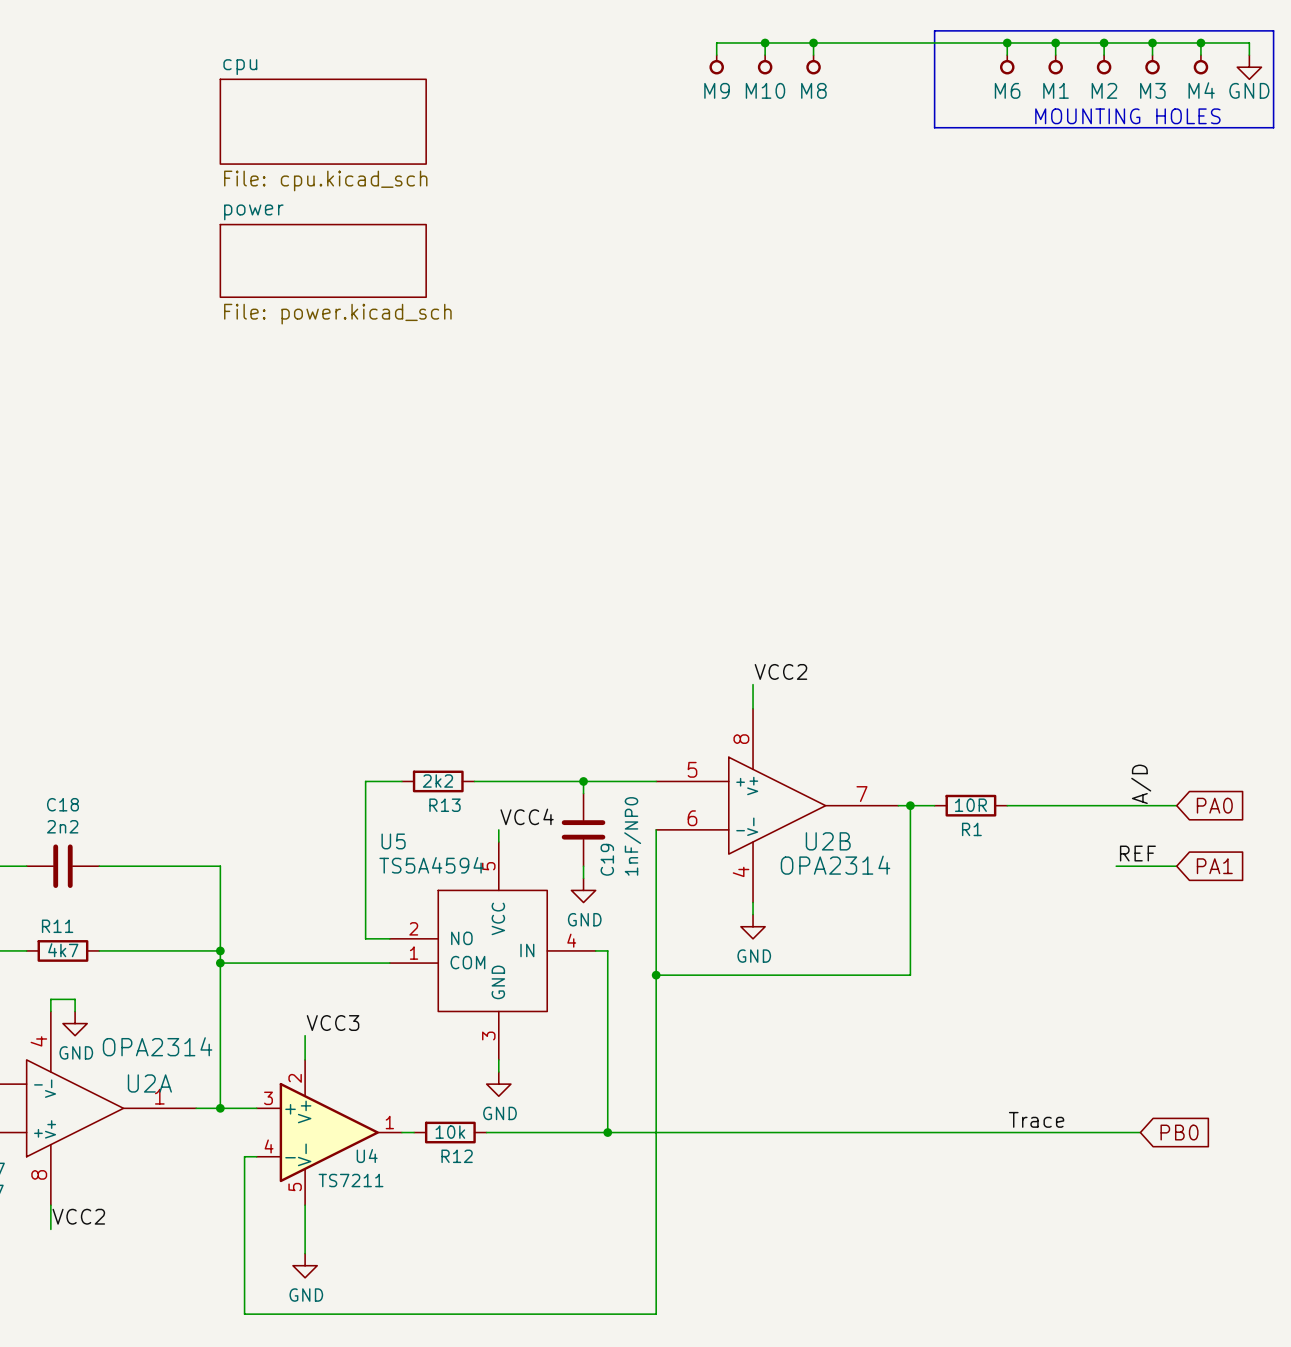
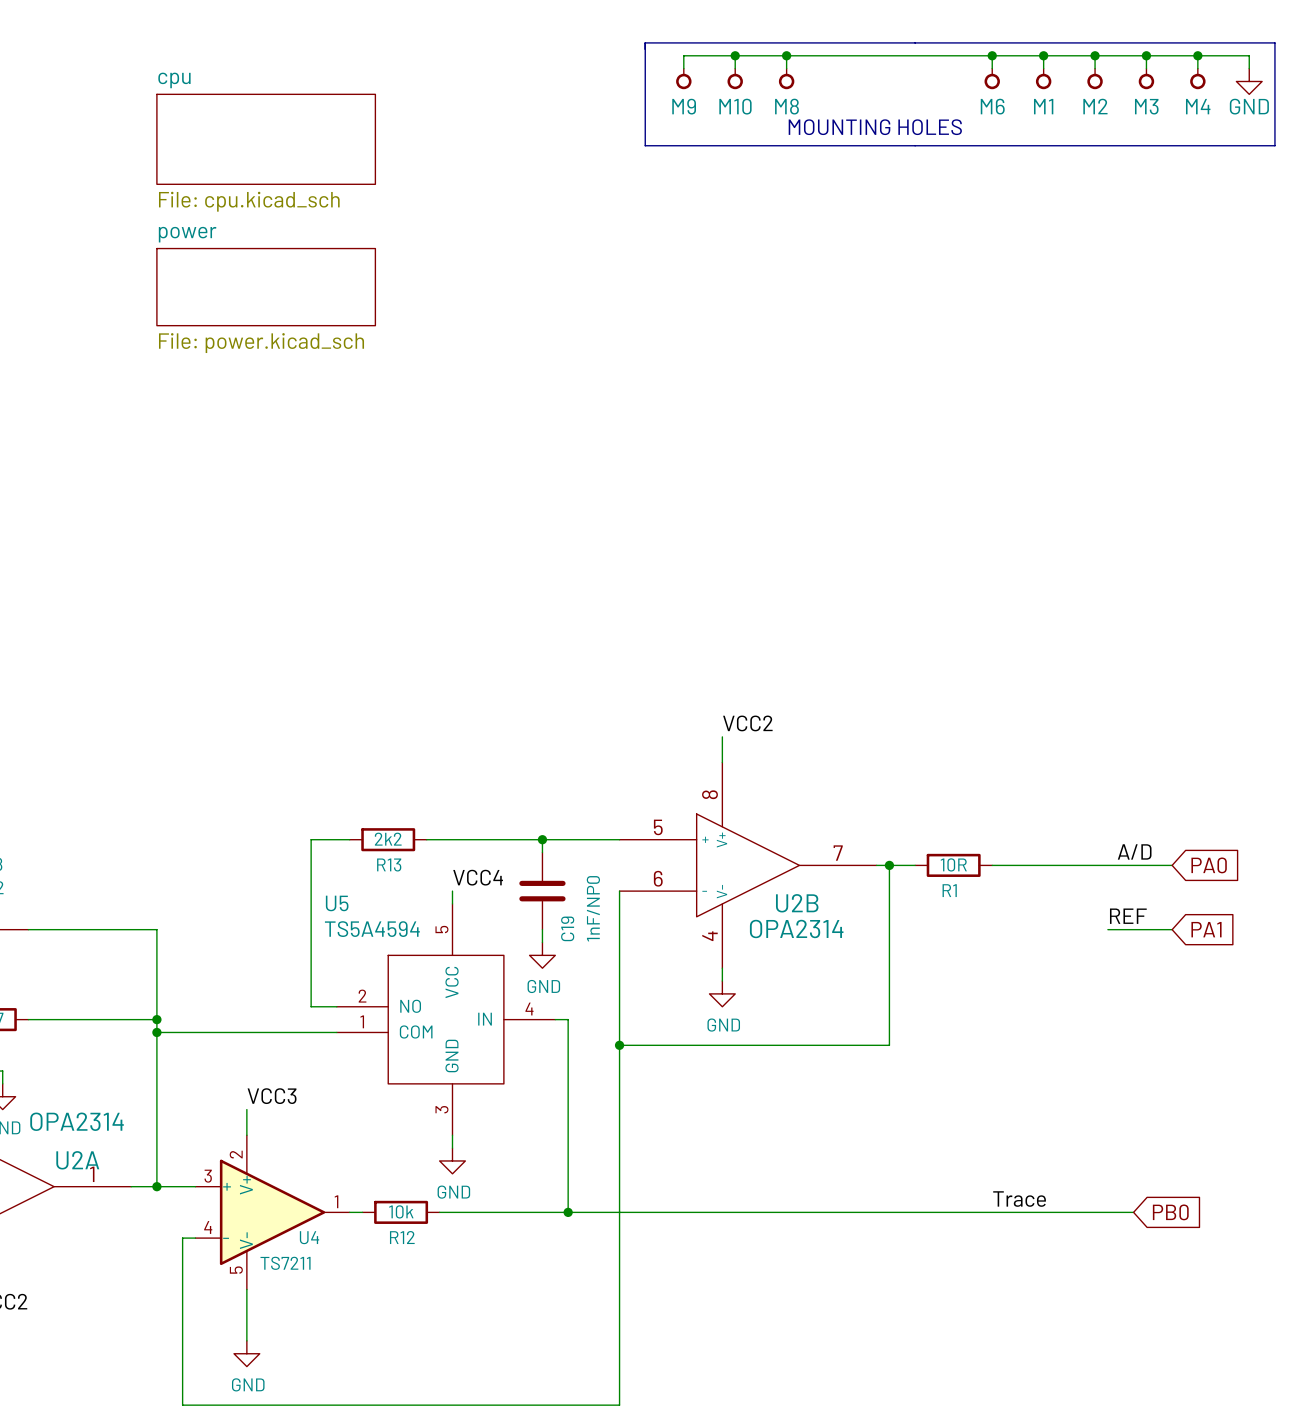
line: (934, 30) (934, 127) -> (915, 42) (645, 42) (645, 145) (915, 145)
text position: MOUNTING HOLES (1127, 116) -> MOUNTING HOLES (875, 127)
label rotation: 0° (1141, 784) -> 90° clockwise (1134, 851)

